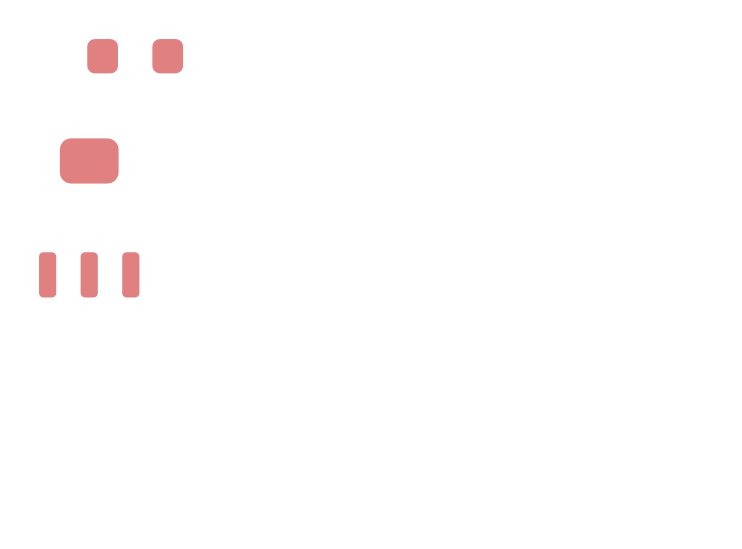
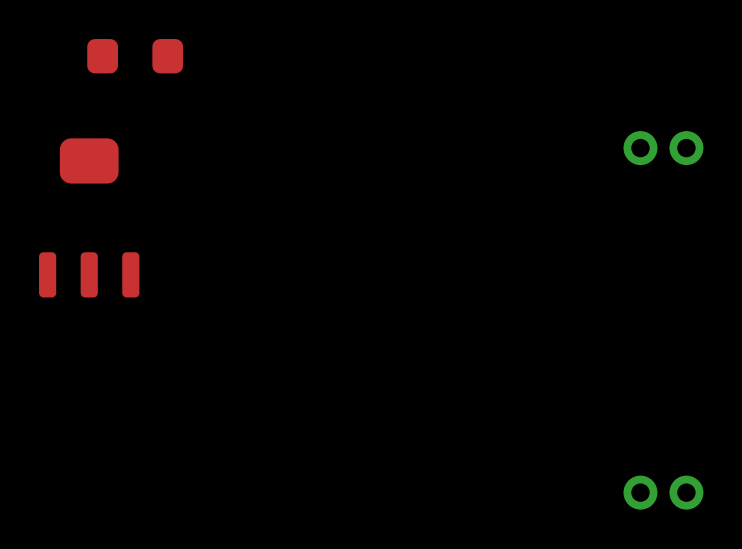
part: none -> (663, 148)
part: none -> (663, 492)

